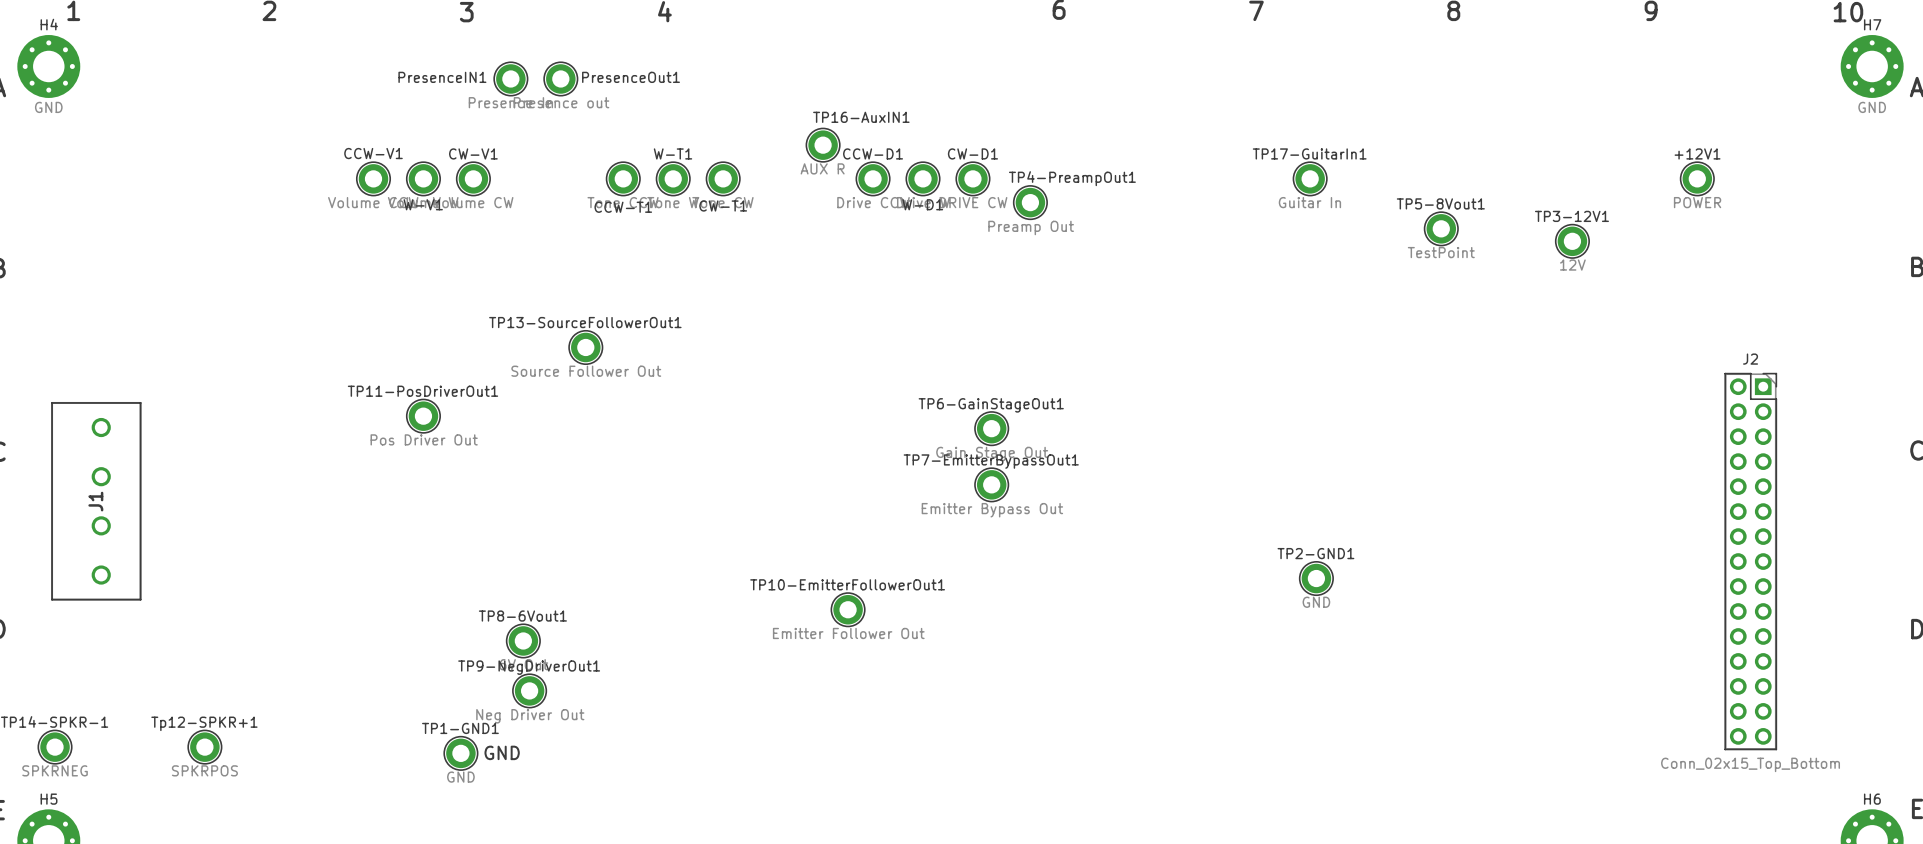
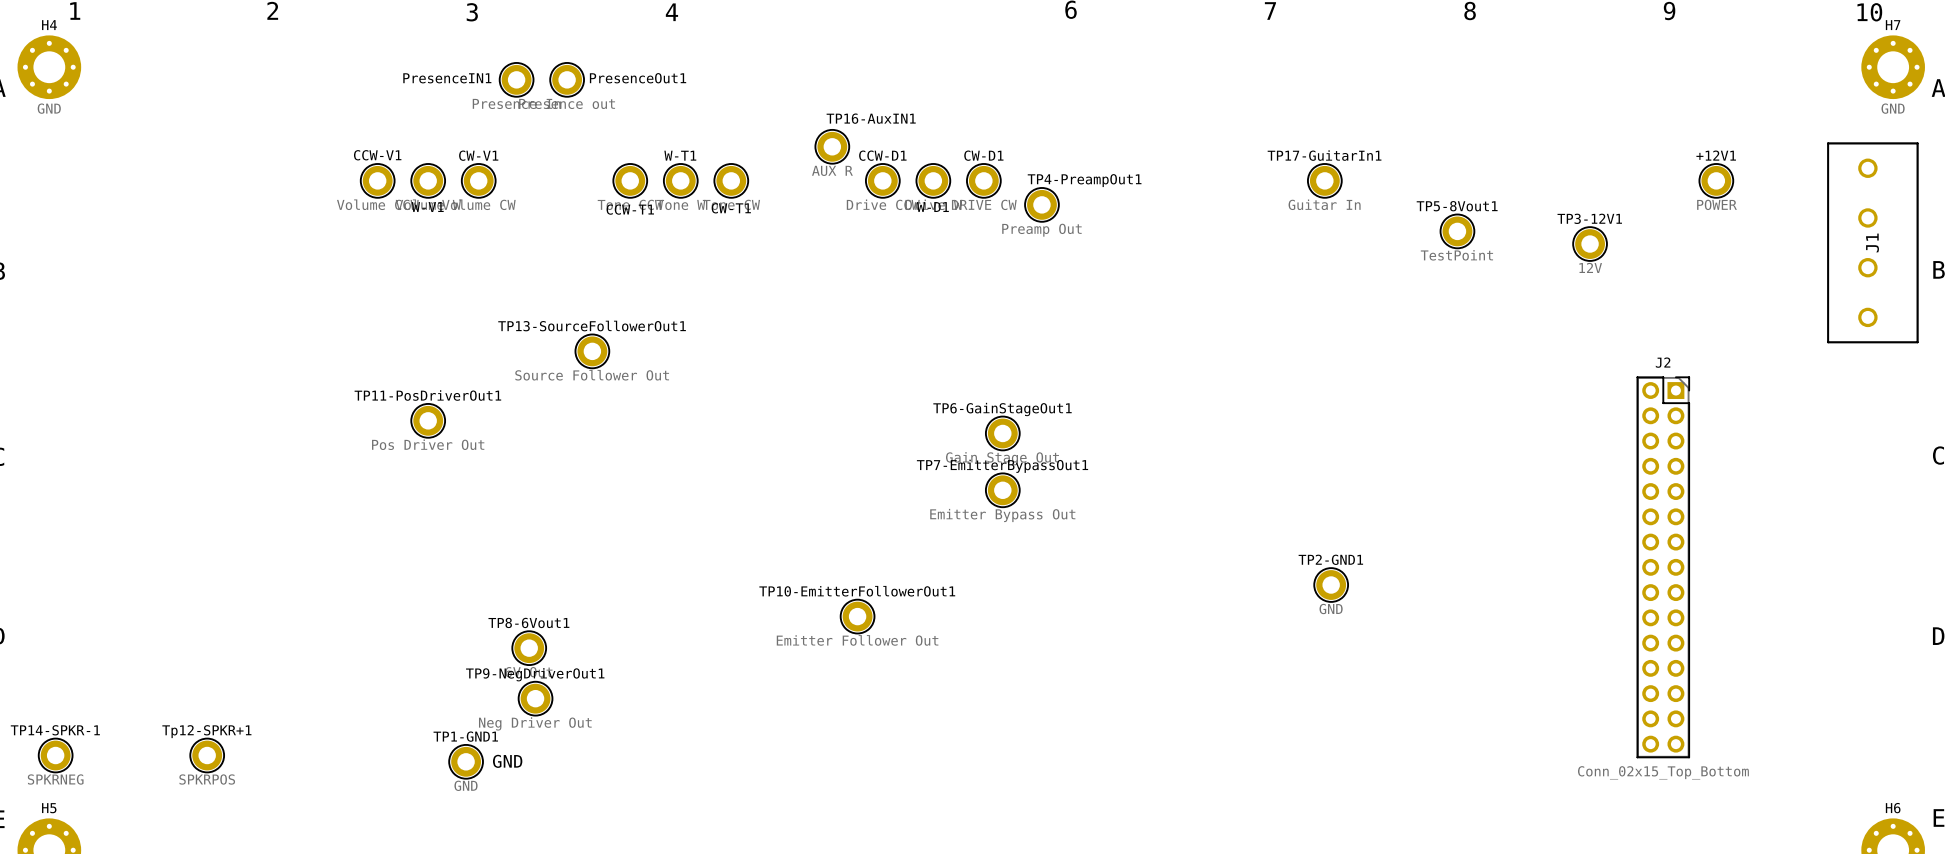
J1 rotation: 0° (96, 501) -> 180° (1872, 242)
J1 position: (96, 501) -> (1872, 242)
J2 position: (1750, 561) -> (1663, 567)

